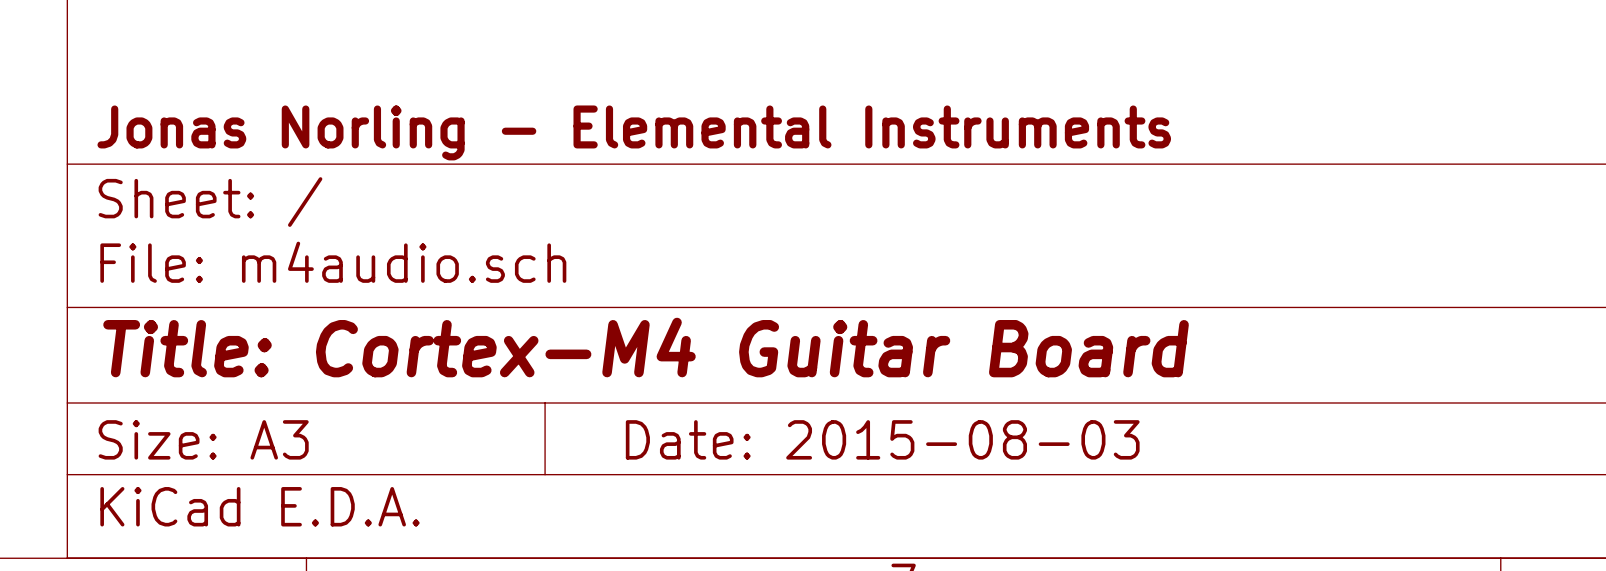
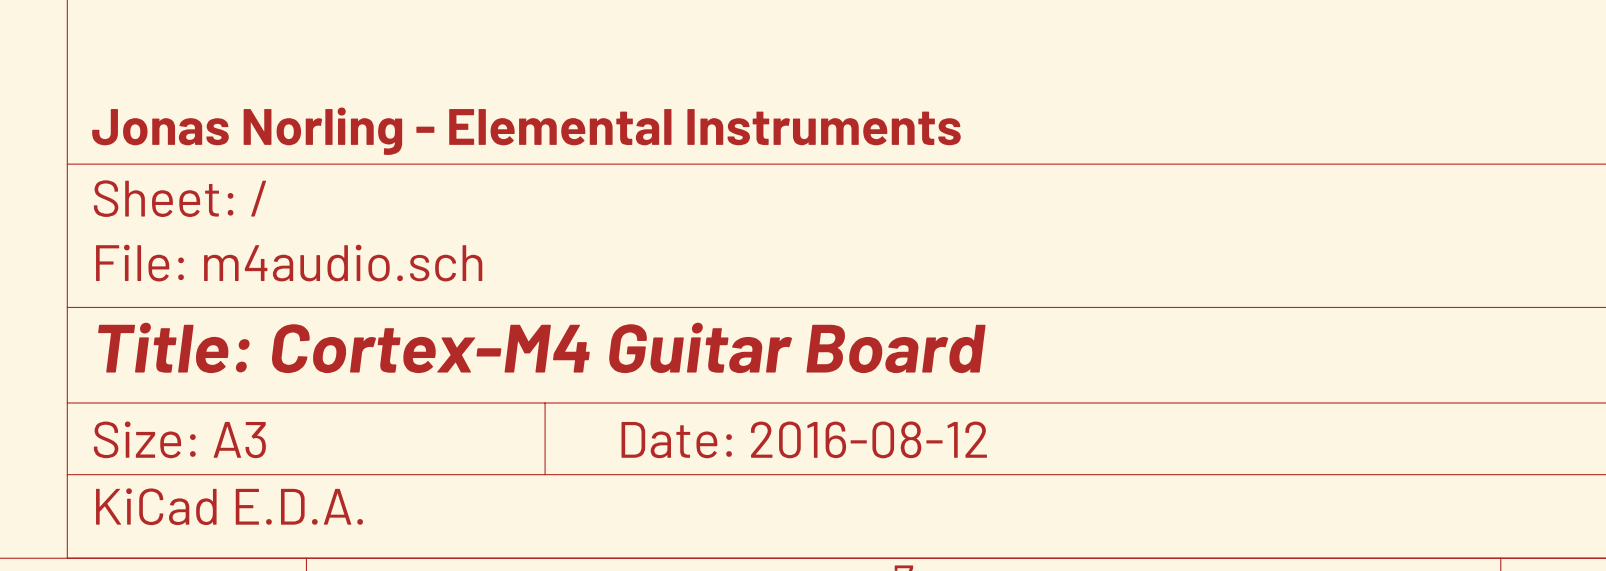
title block: Date: 2015-08-03 (882, 439) -> Date: 2016-08-12 (804, 439)

